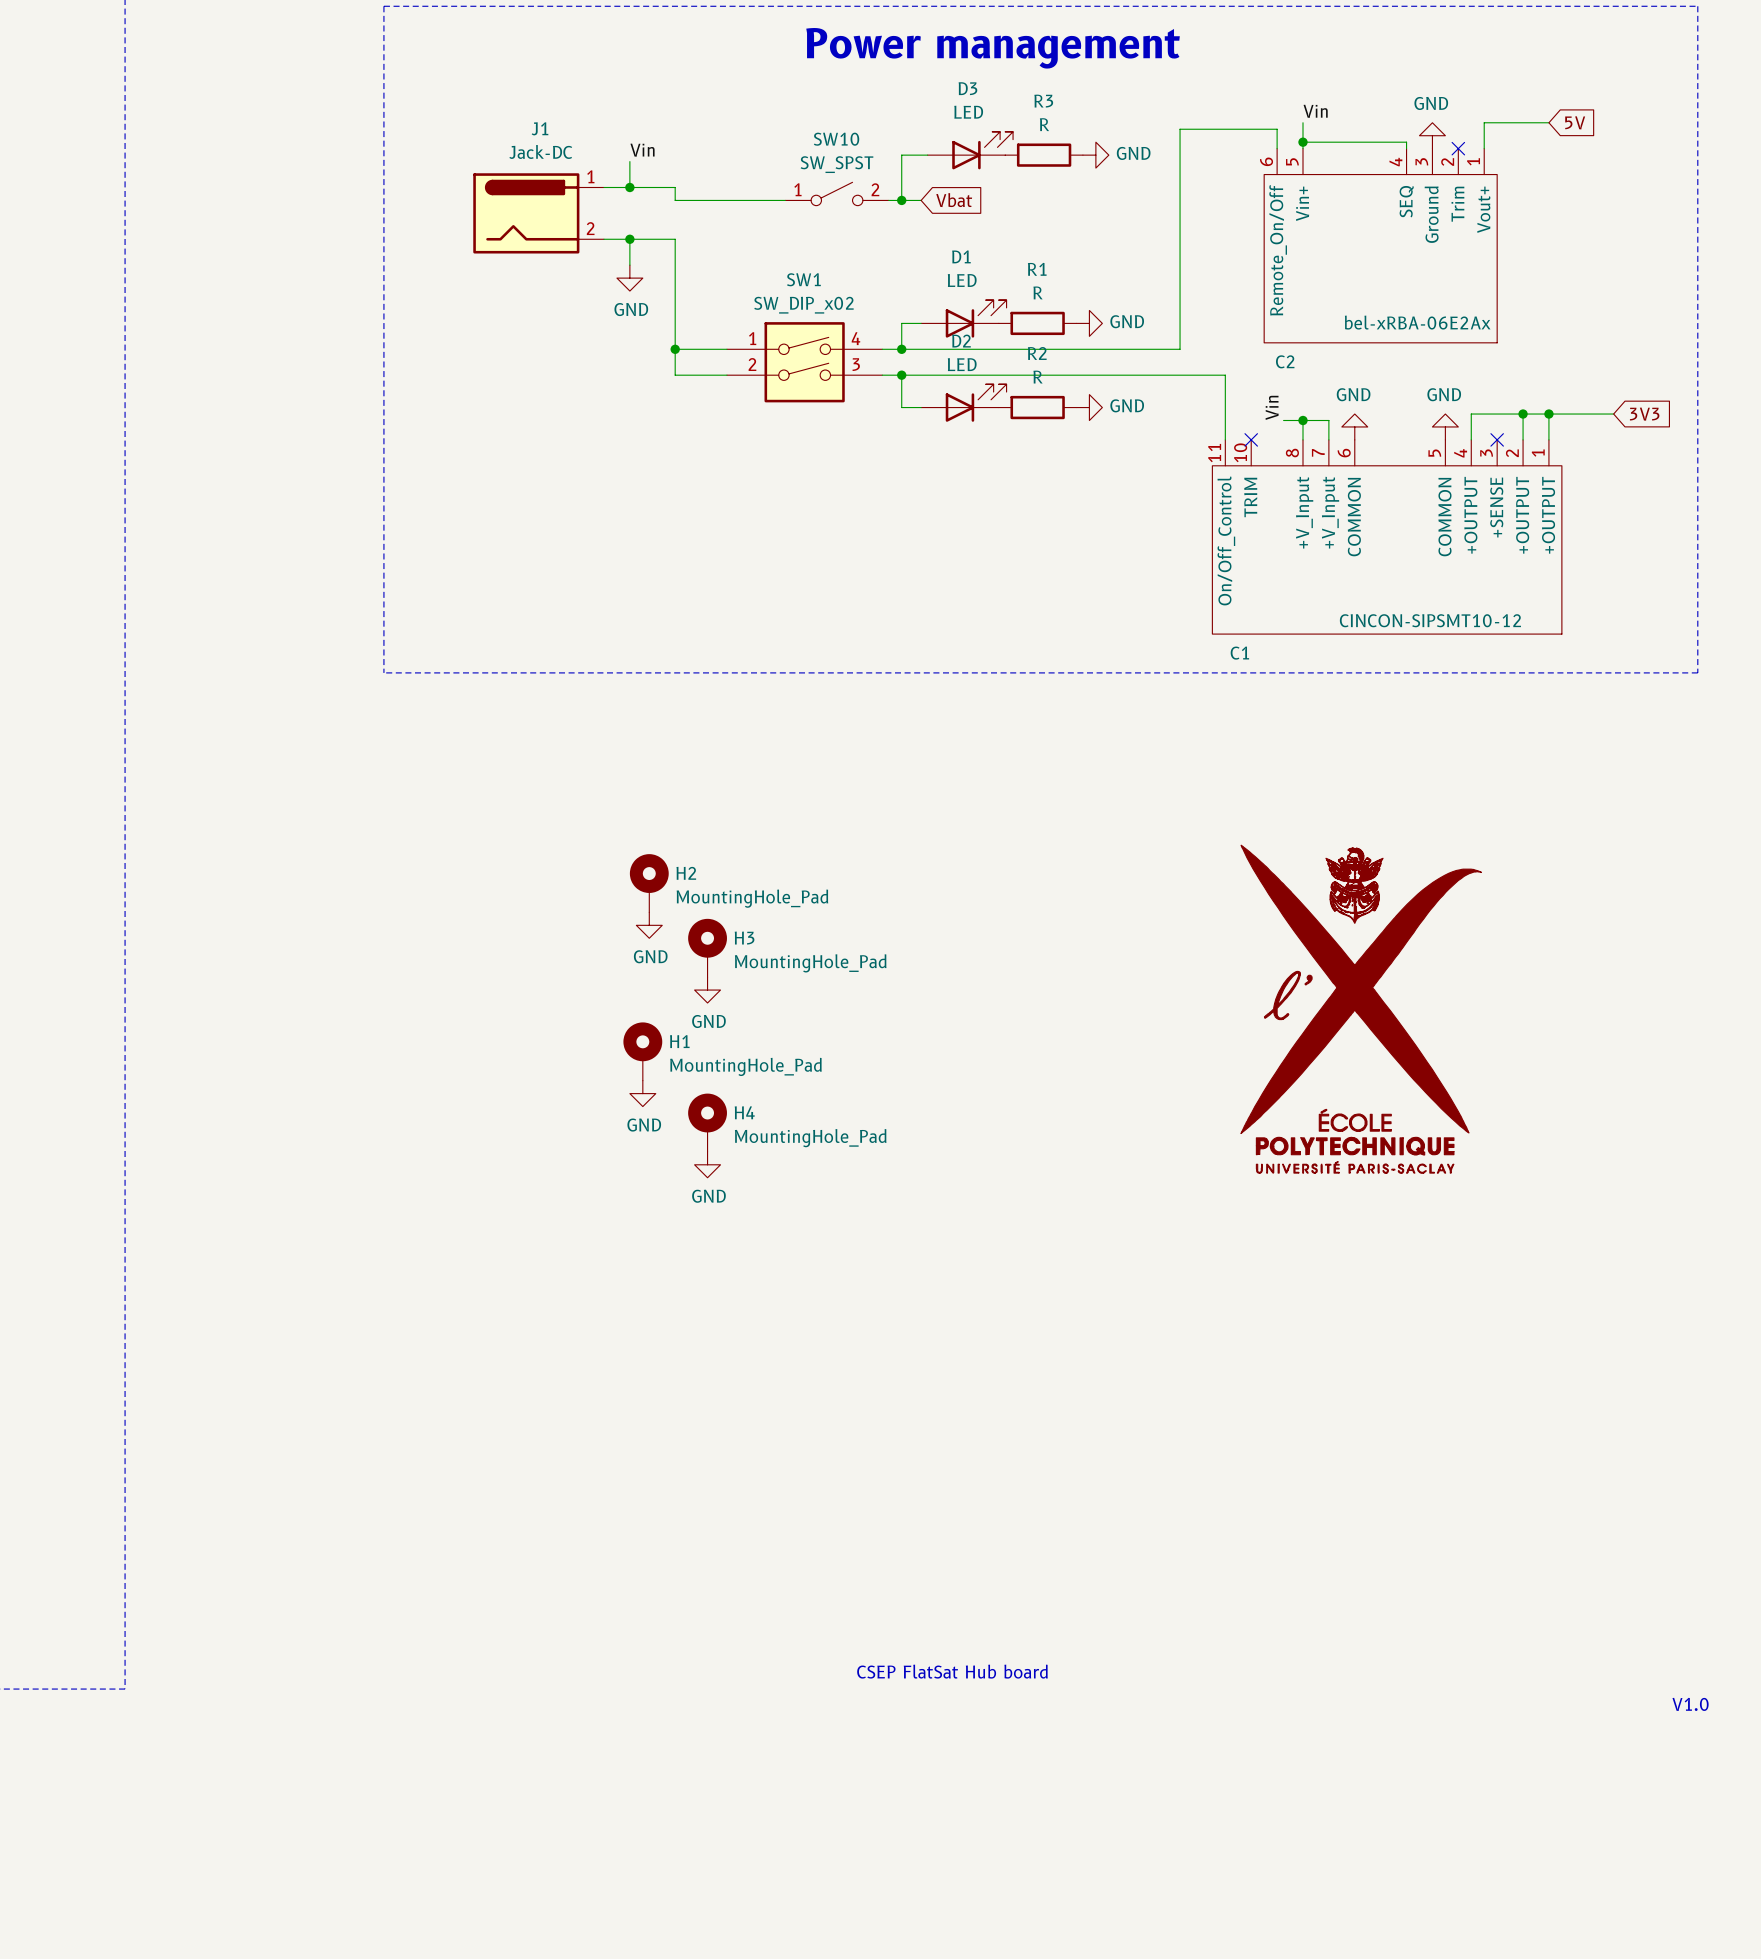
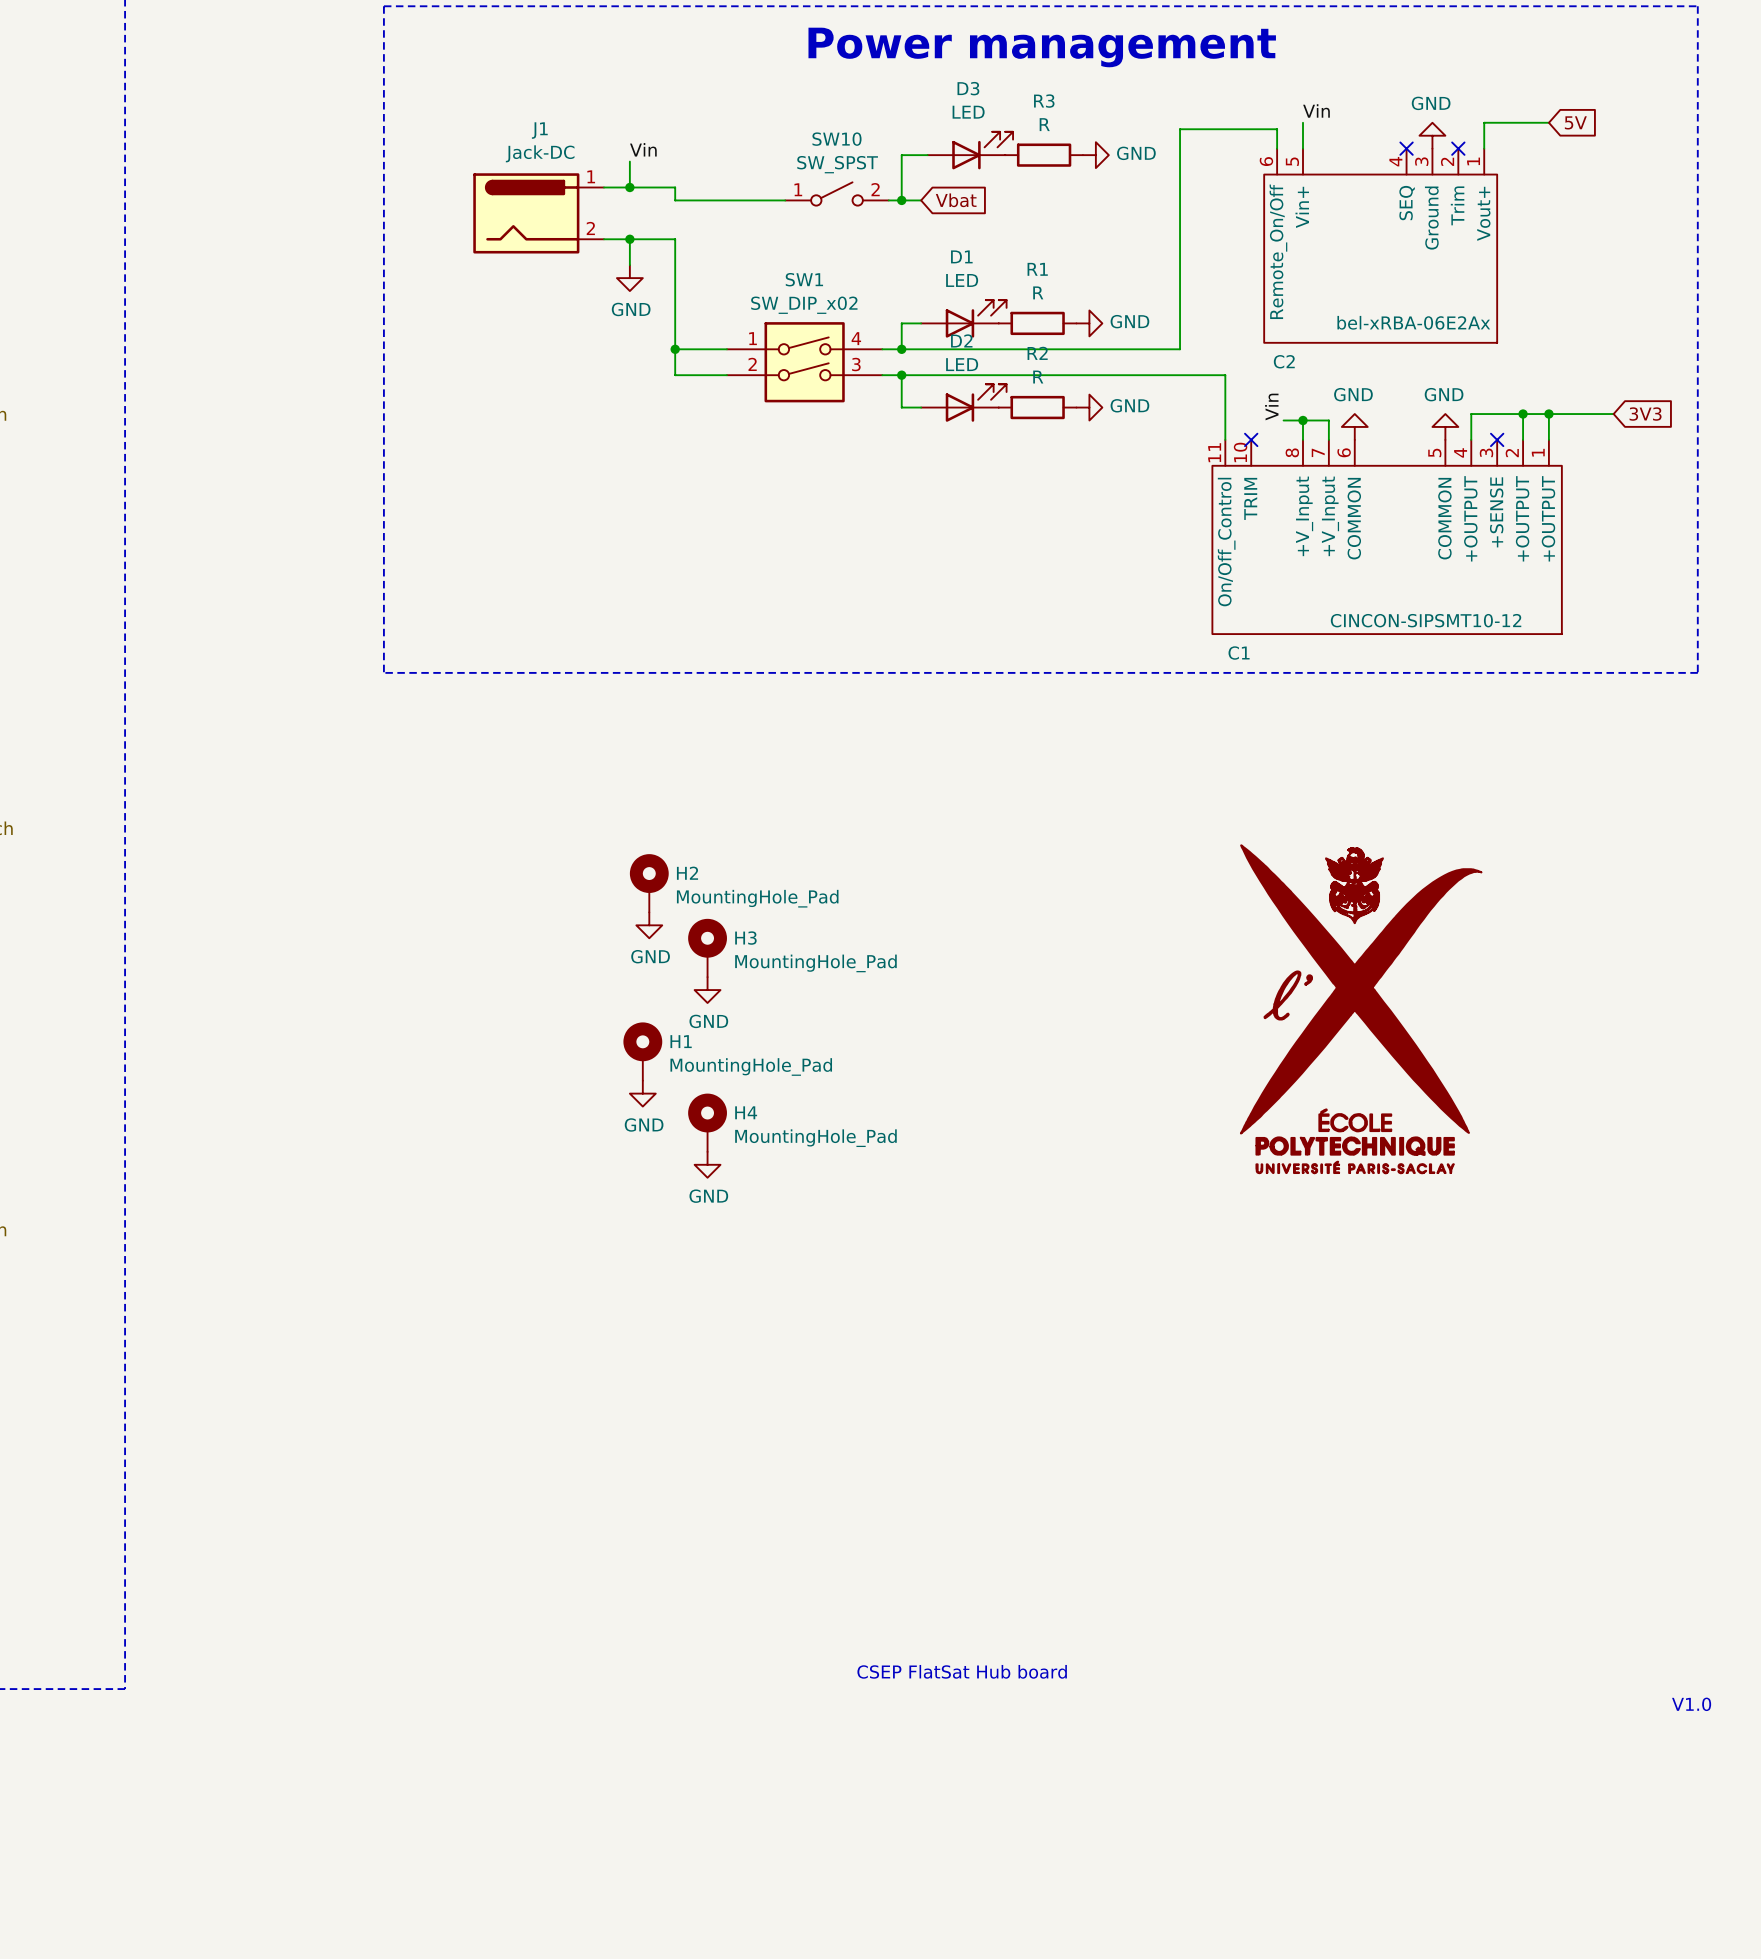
wire: (1303, 142) (1406, 142) (1406, 148) -> none
junction: (1303, 142) -> none
no-connect mark: none -> (1406, 148)

